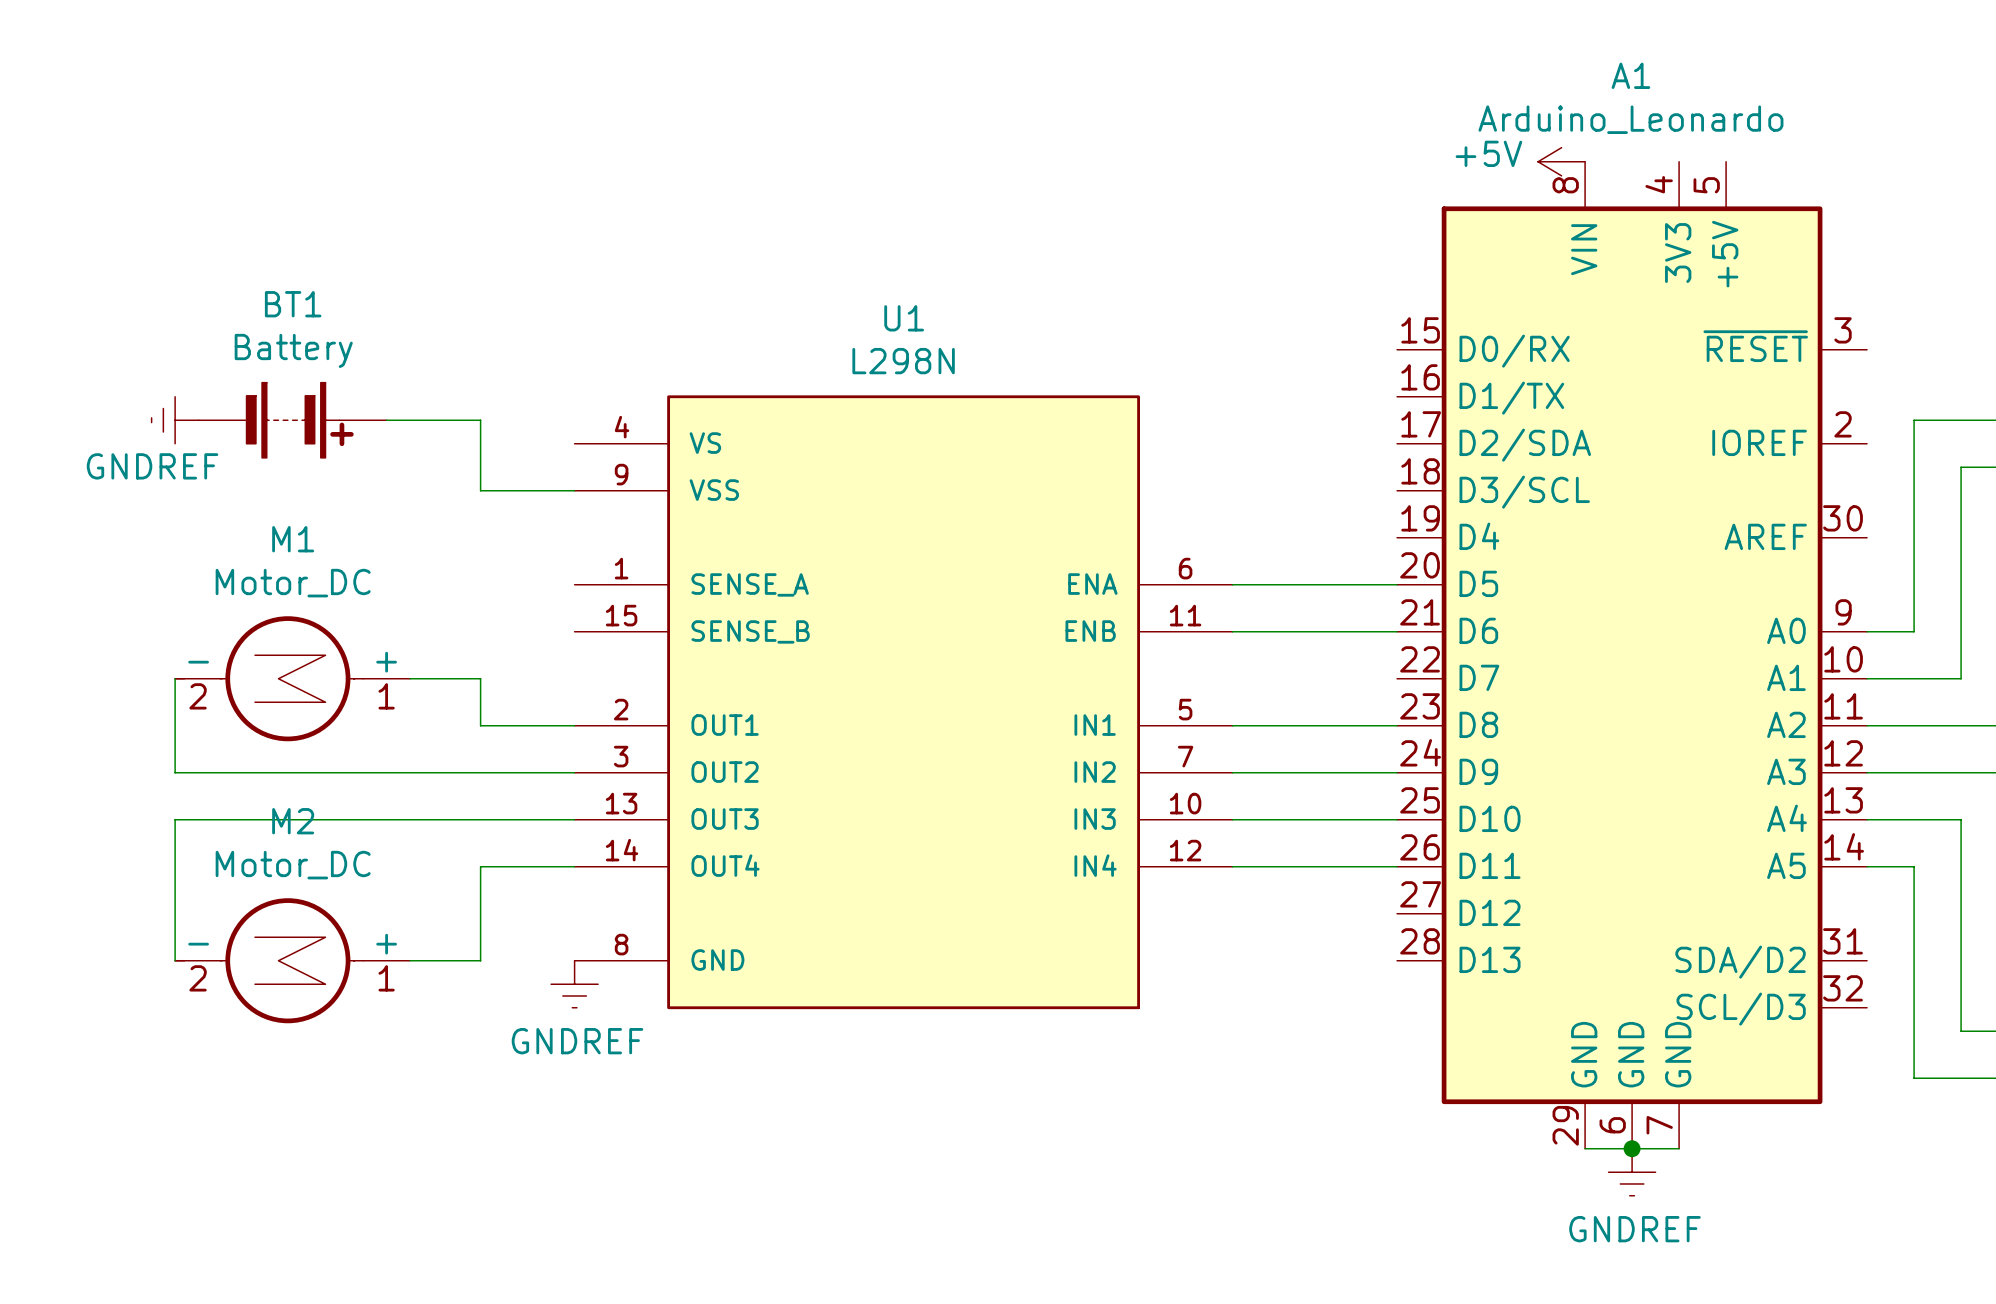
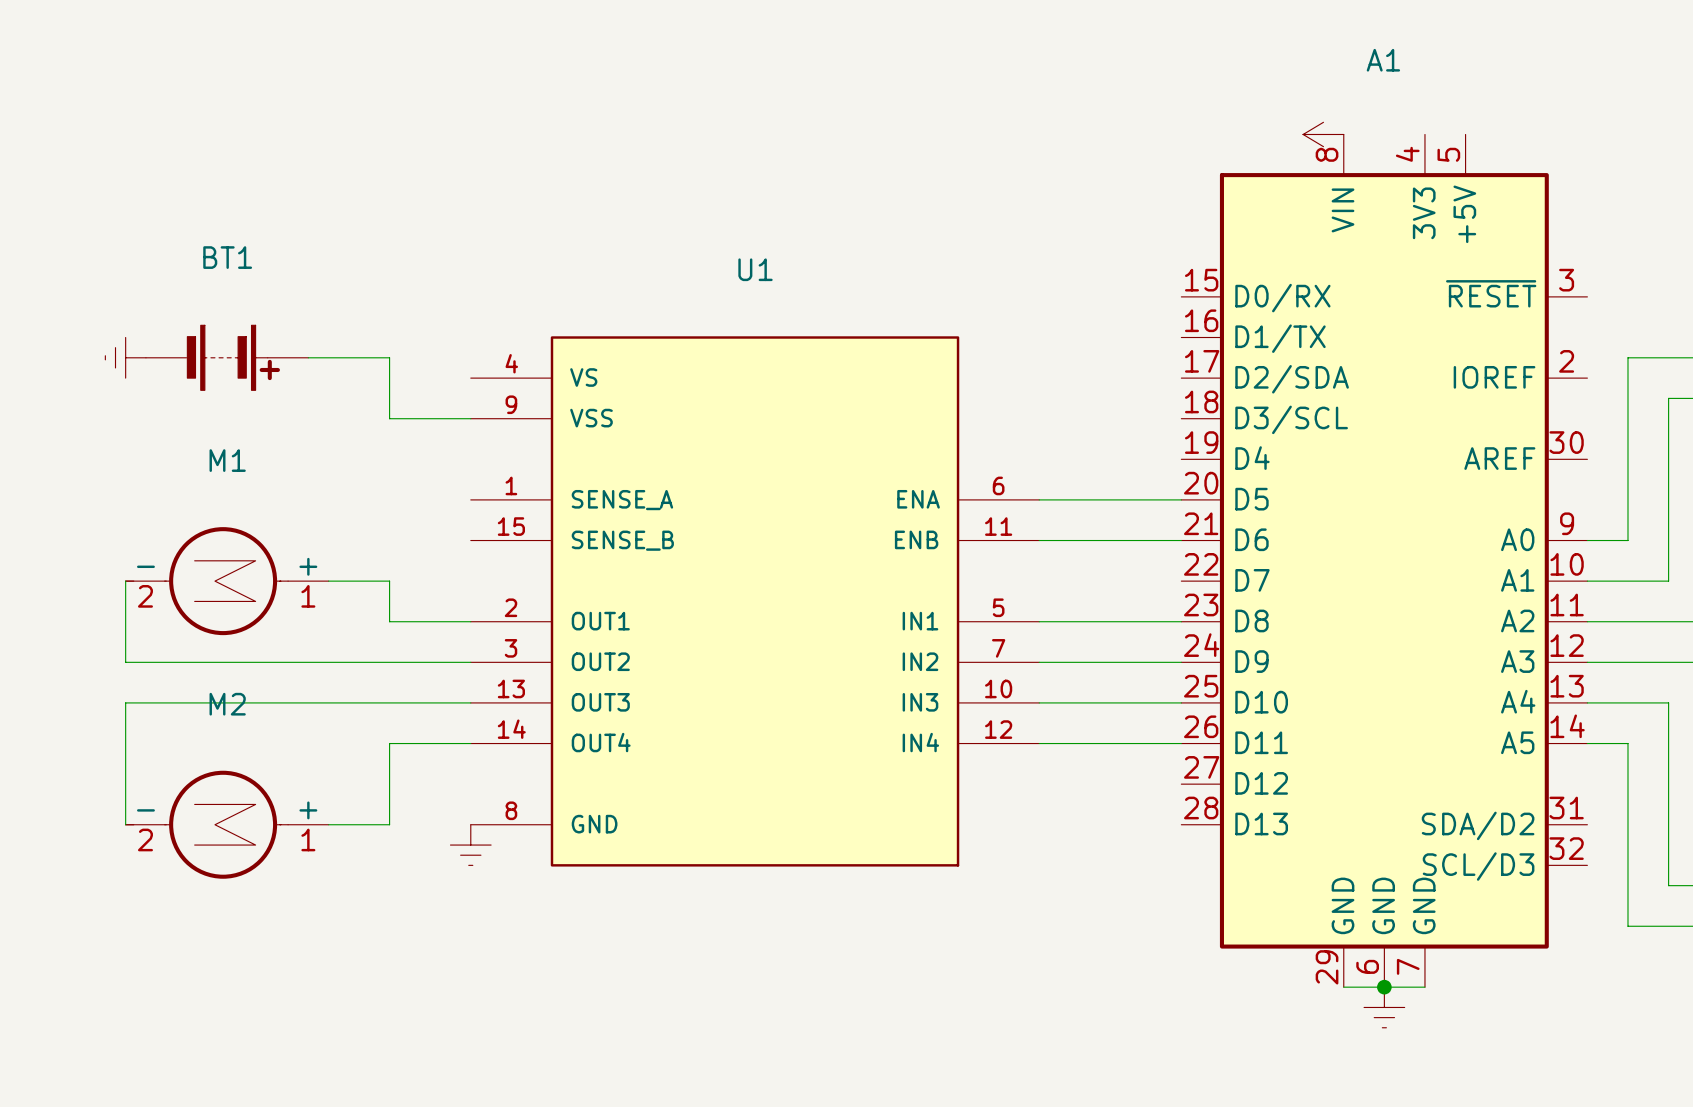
A1 value: Arduino_Leonardo (1630, 119) -> none
power symbol text: +5V (1488, 153) -> none
BT1 value: Battery (293, 350) -> none
U1 value: L298N (903, 361) -> none
power symbol text: GNDREF (152, 466) -> none
M1 value: Motor_DC (293, 583) -> none
M2 value: Motor_DC (293, 865) -> none
power symbol text: GNDREF (577, 1041) -> none
power symbol text: GNDREF (1634, 1229) -> none

